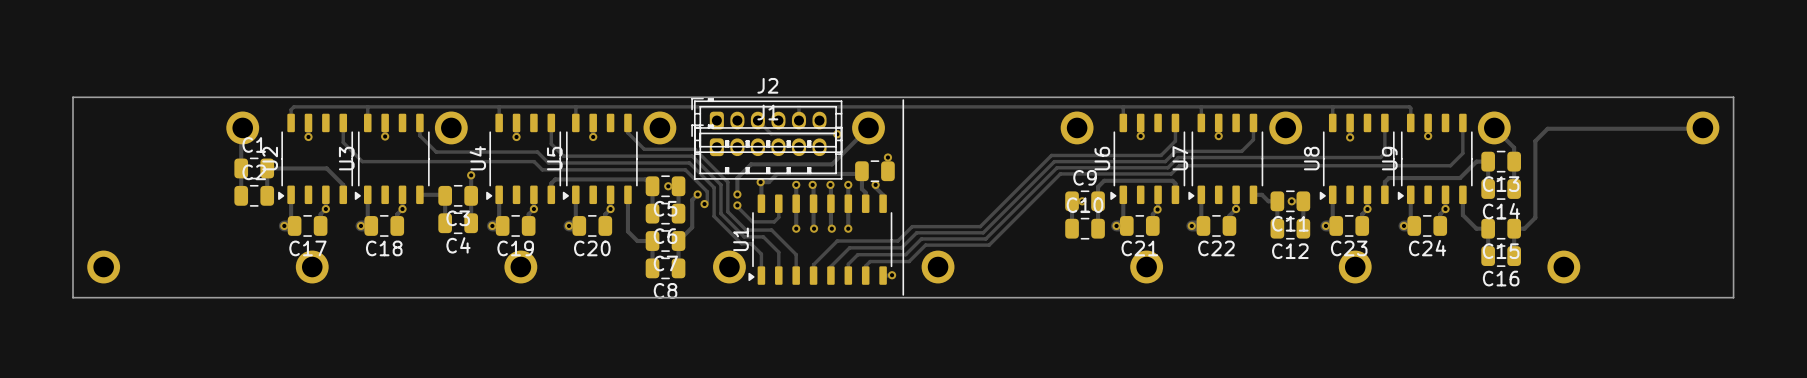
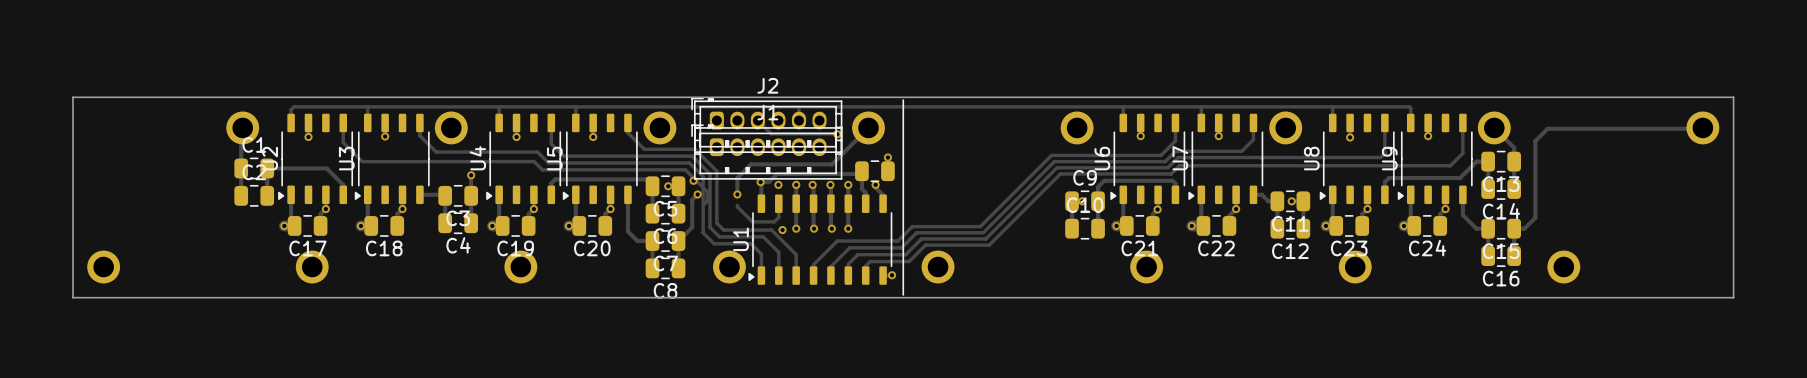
track: (716, 171) (727, 182) (727, 211) (746, 230) -> (716, 171) (716, 223) (723, 230) (746, 230)
track: (710, 173) (720, 184) (720, 213) (744, 236) -> (710, 173) (710, 227) (719, 236) (744, 236)
track: (703, 176) (714, 187) (714, 216) (741, 243) -> (703, 176) (703, 232) (714, 243) (741, 243)
via: none -> (693, 180)
via: none -> (778, 184)
via: (704, 204) -> none
via: (737, 205) -> none
via: none -> (782, 230)

